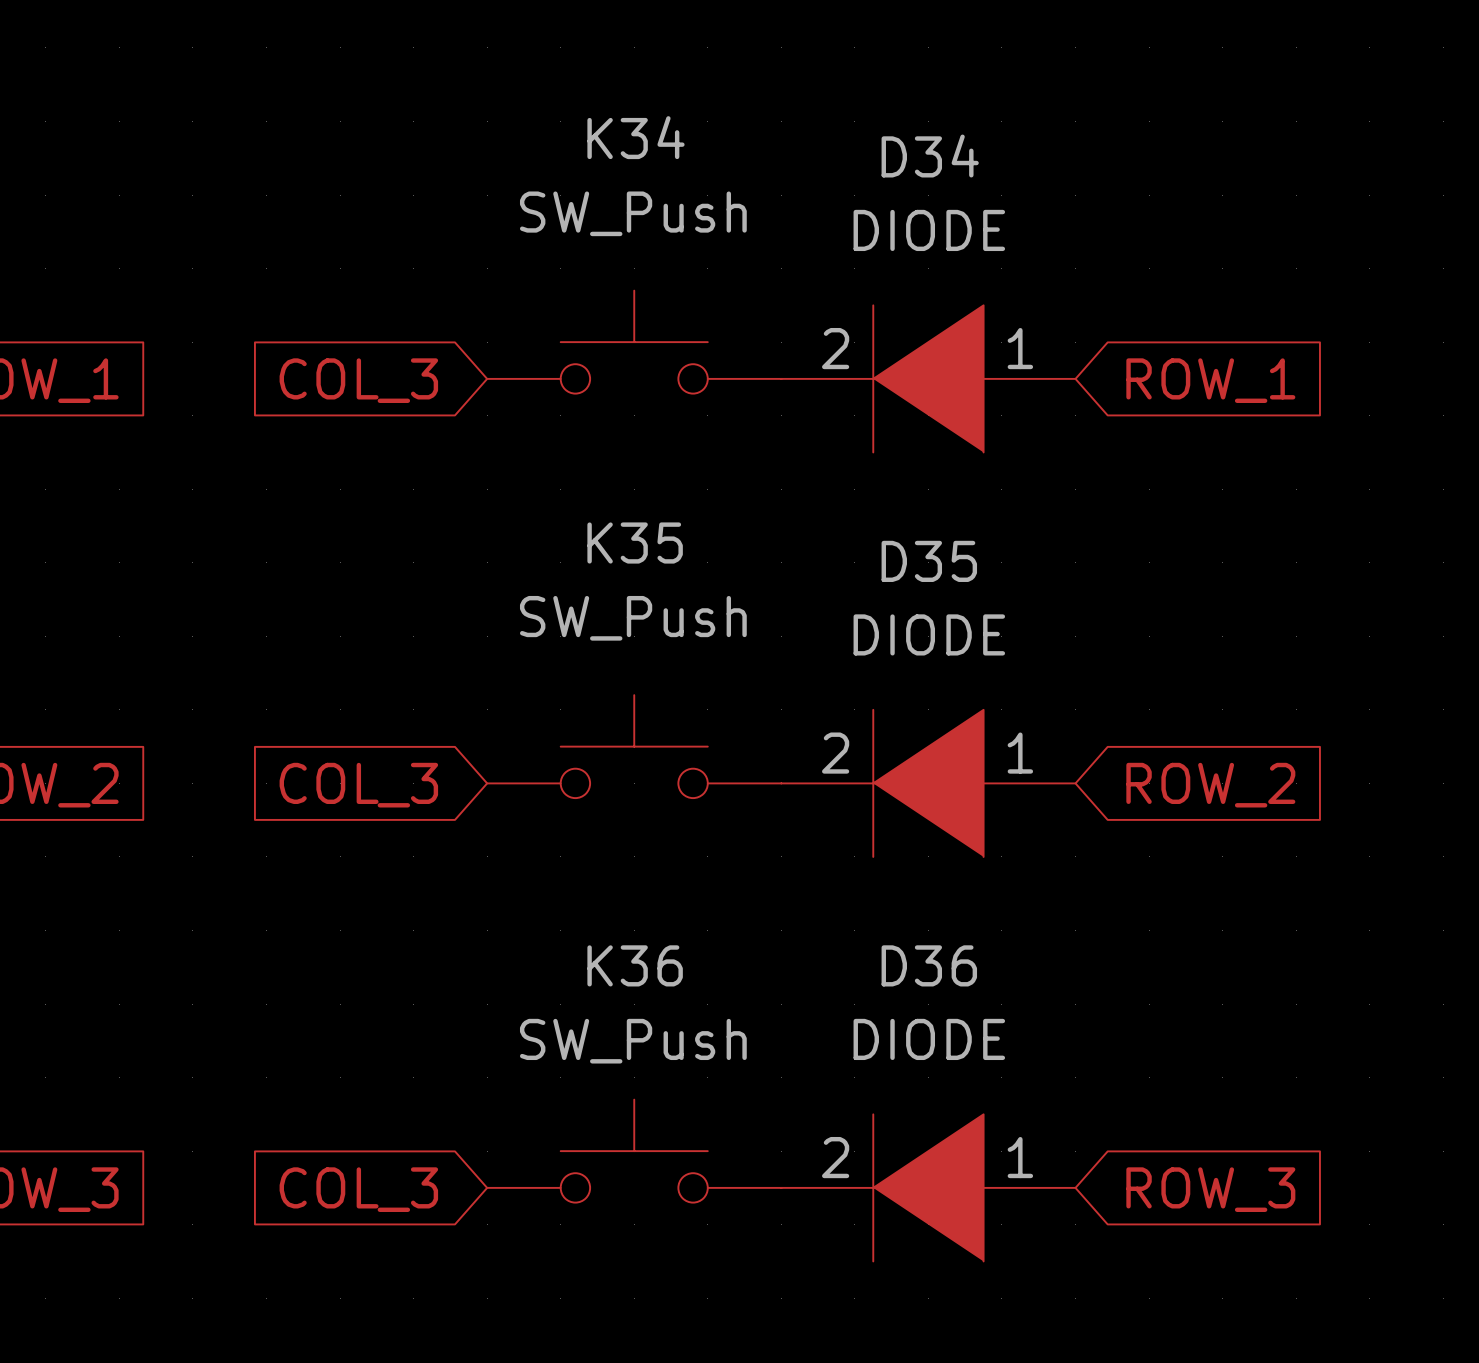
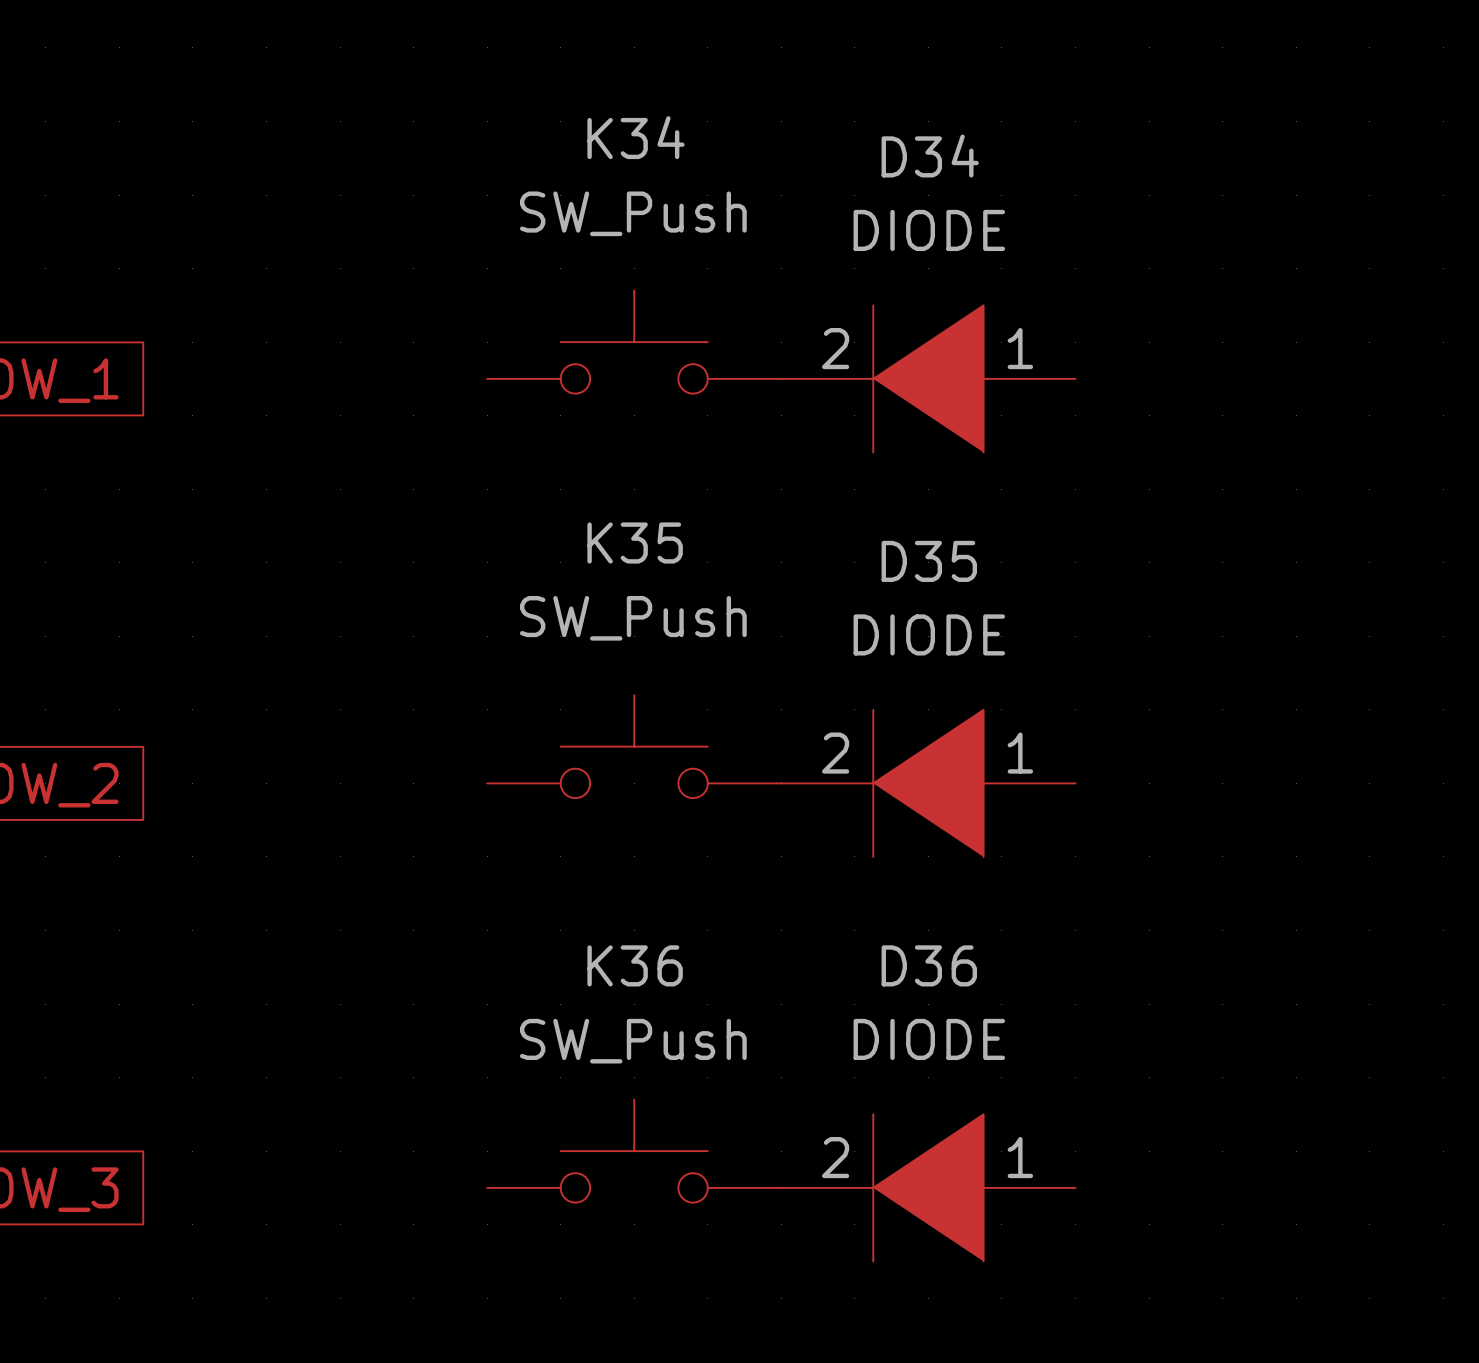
global label: COL_3 (358, 380) -> none
global label: ROW_1 (1210, 380) -> none
global label: COL_3 (358, 785) -> none
global label: ROW_2 (1210, 785) -> none
global label: COL_3 (358, 1189) -> none
global label: ROW_3 (1210, 1189) -> none

